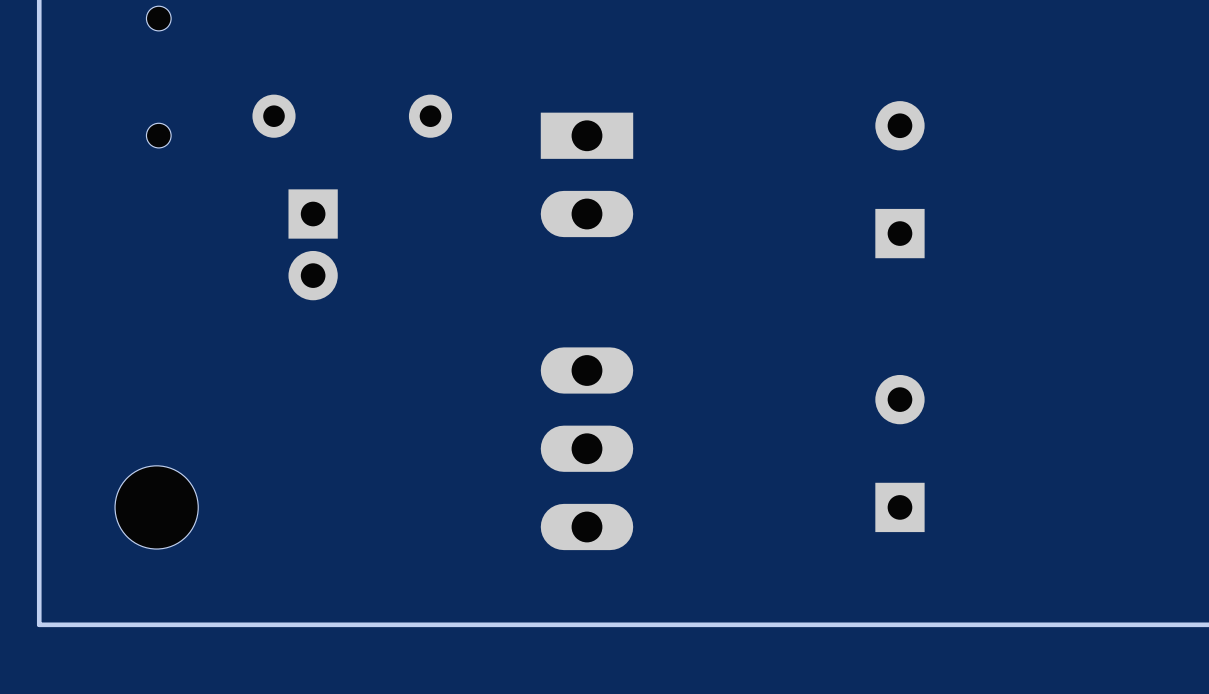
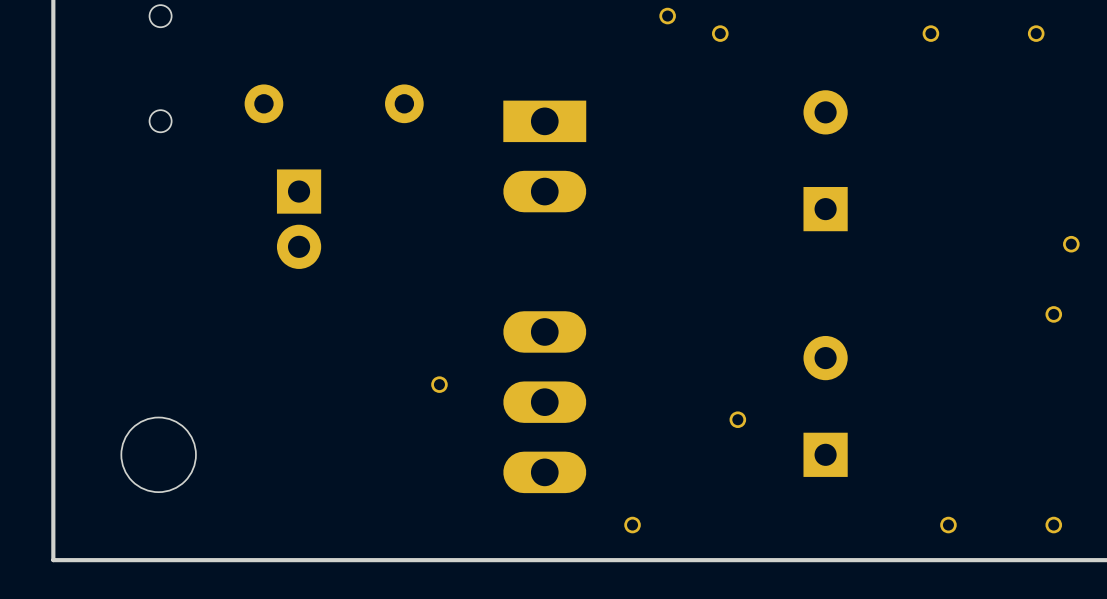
part: none -> (667, 16)
part: none -> (720, 33)
part: none -> (930, 33)
part: none -> (1036, 33)
part: none -> (1071, 244)
part: none -> (1053, 314)
part: none -> (439, 384)
part: none -> (737, 419)
part: none -> (632, 525)
part: none -> (948, 525)
part: none -> (1053, 525)

